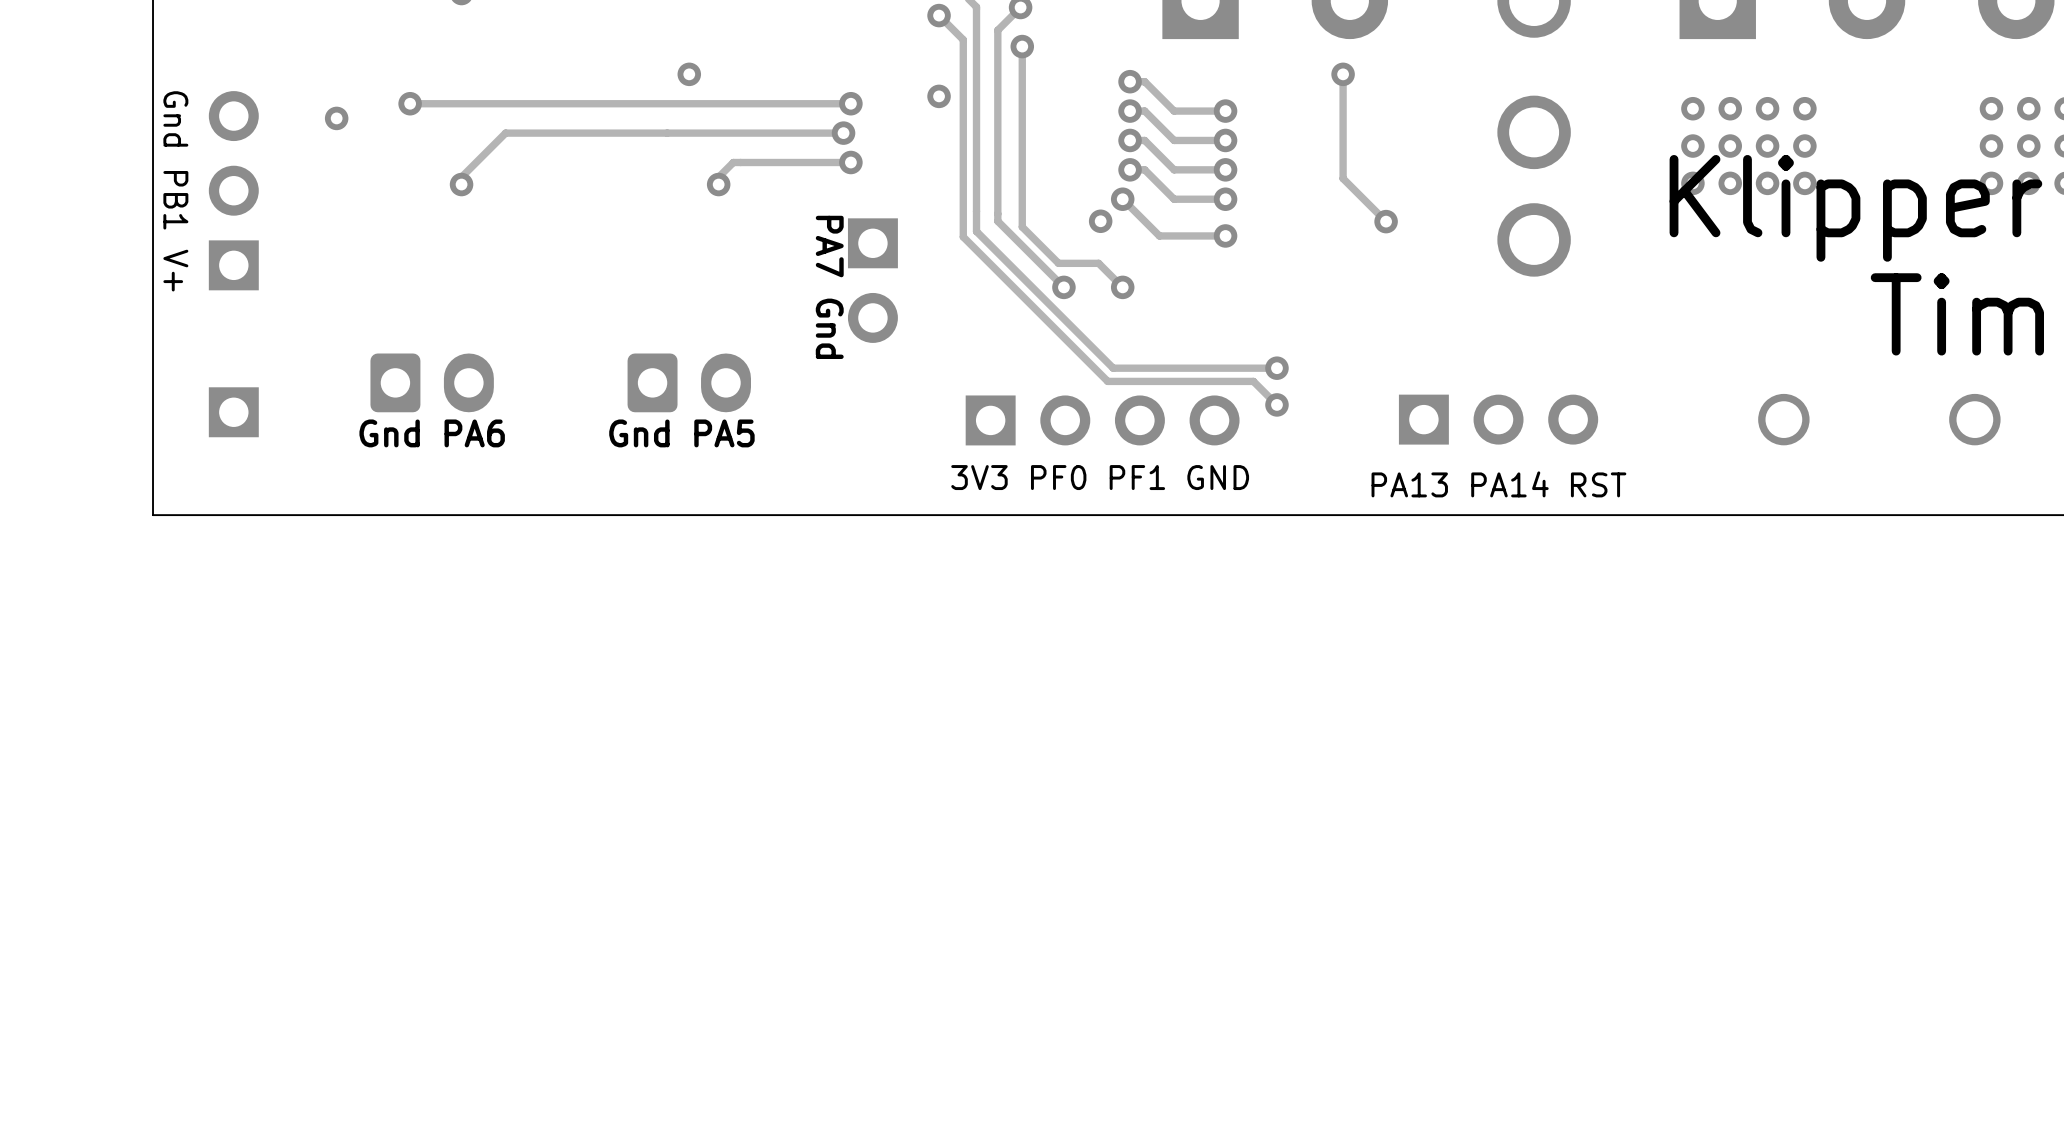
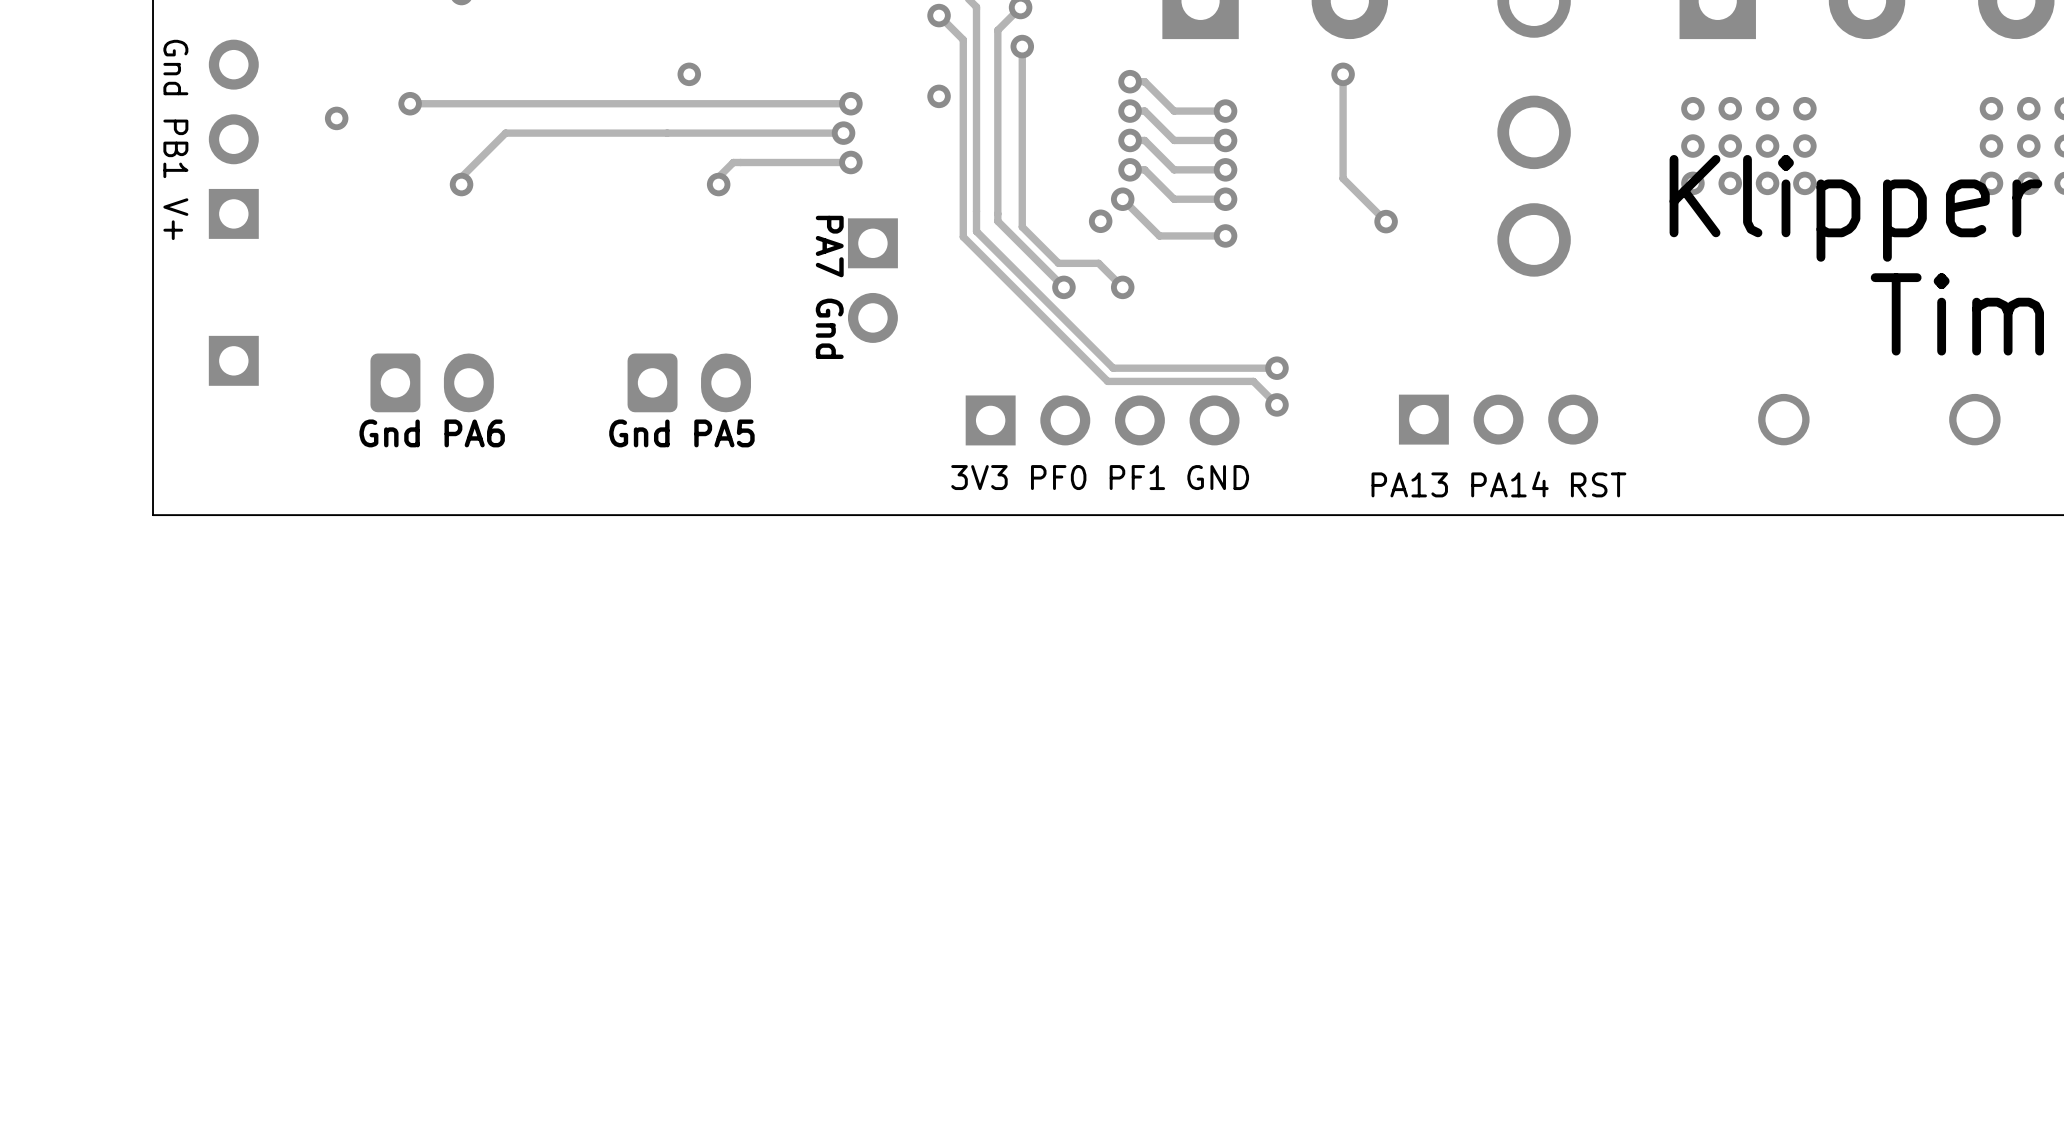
part position: (233, 190) -> (233, 139)
text position: Gnd PB1 V+ (175, 191) -> Gnd PB1 V+ (175, 139)
part position: (233, 412) -> (233, 360)

